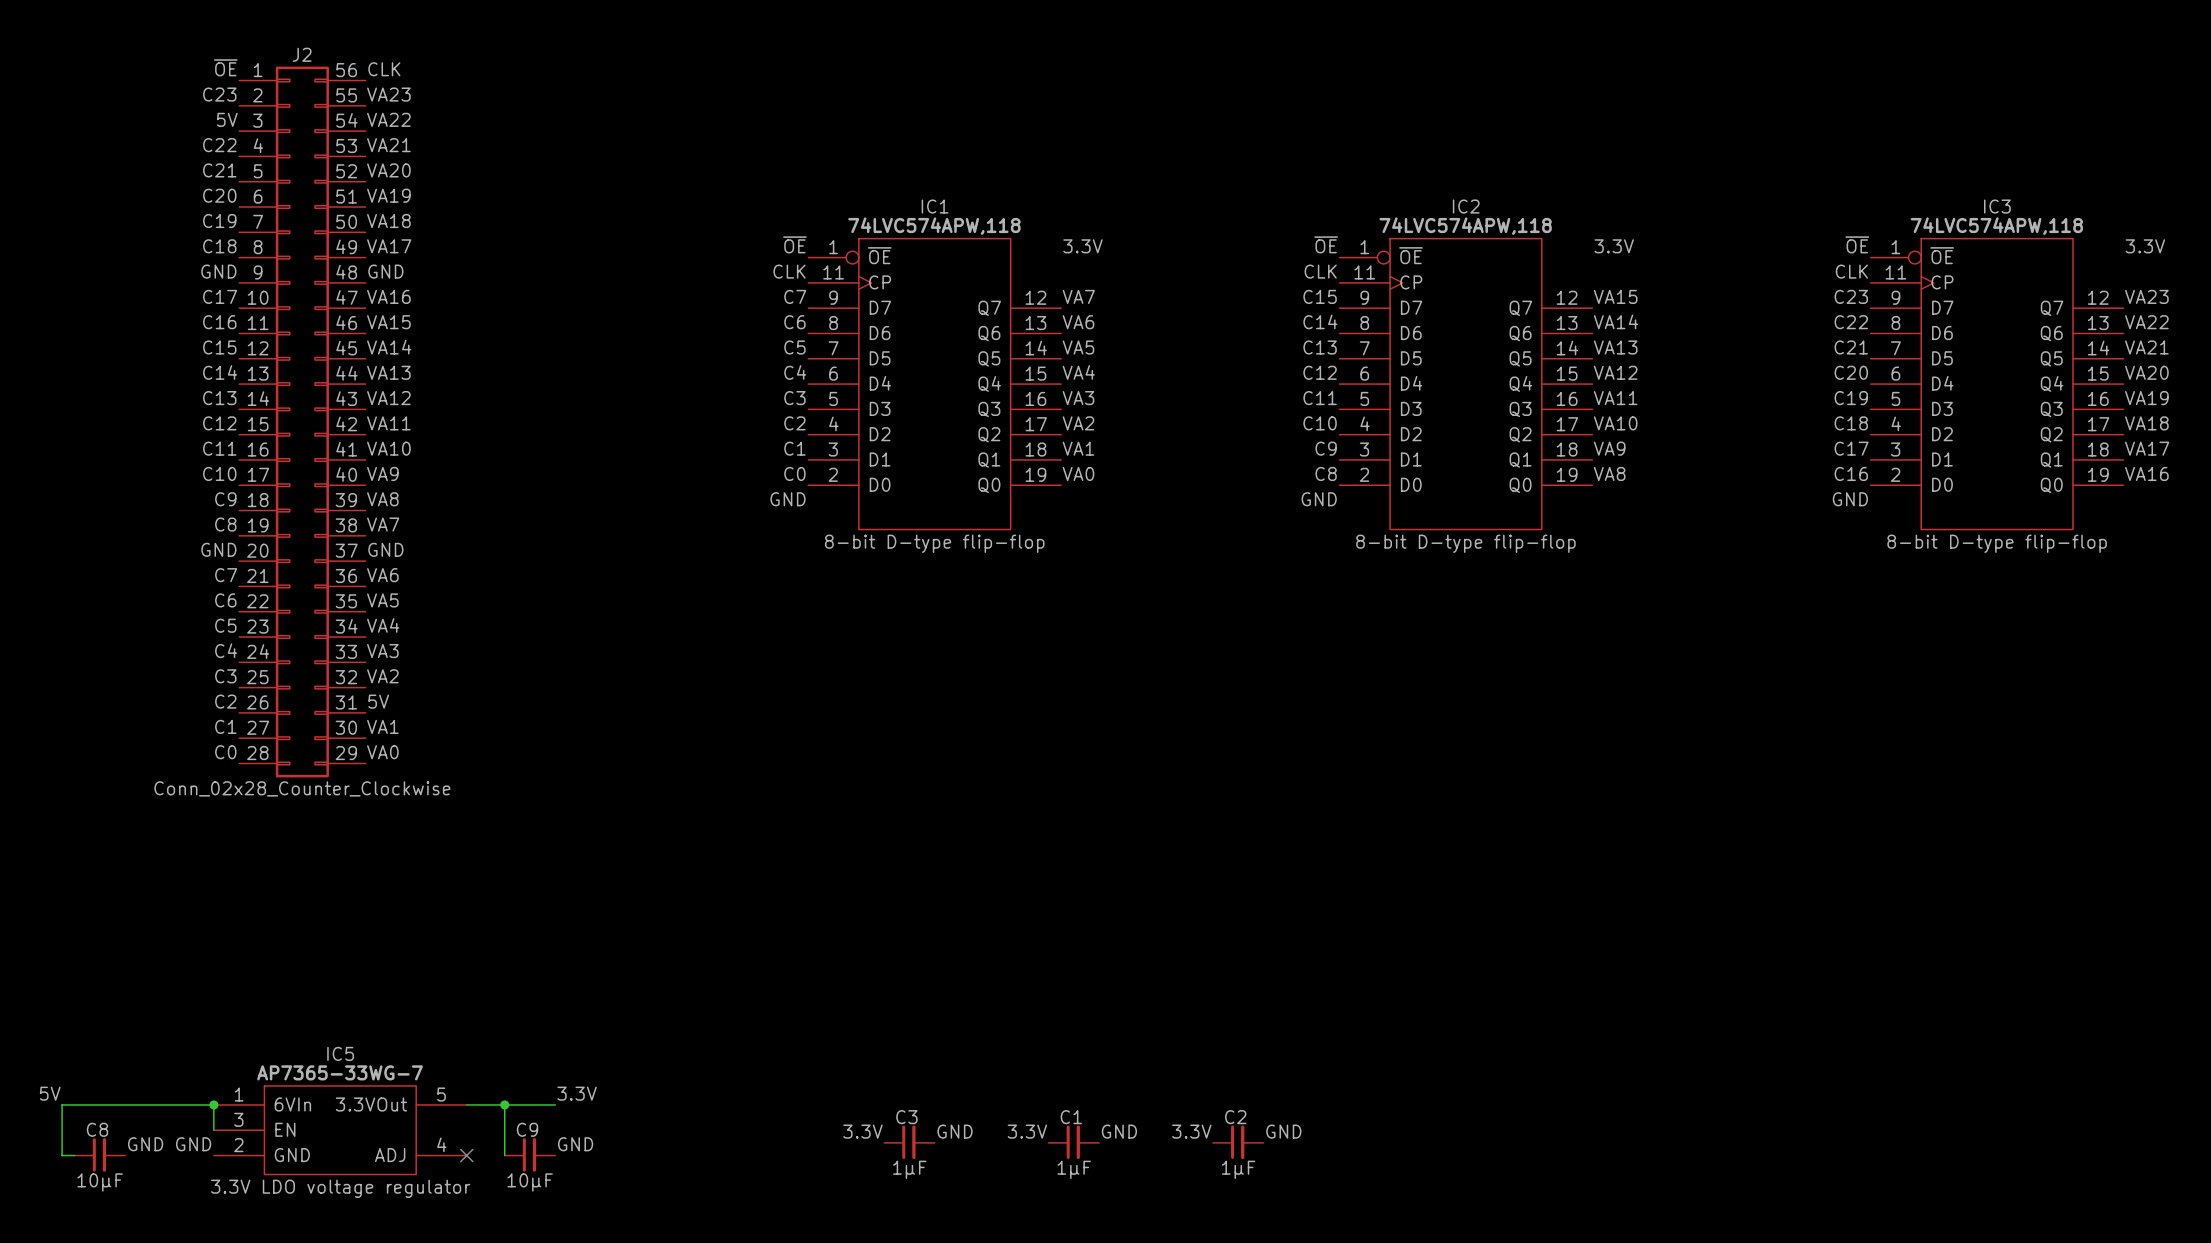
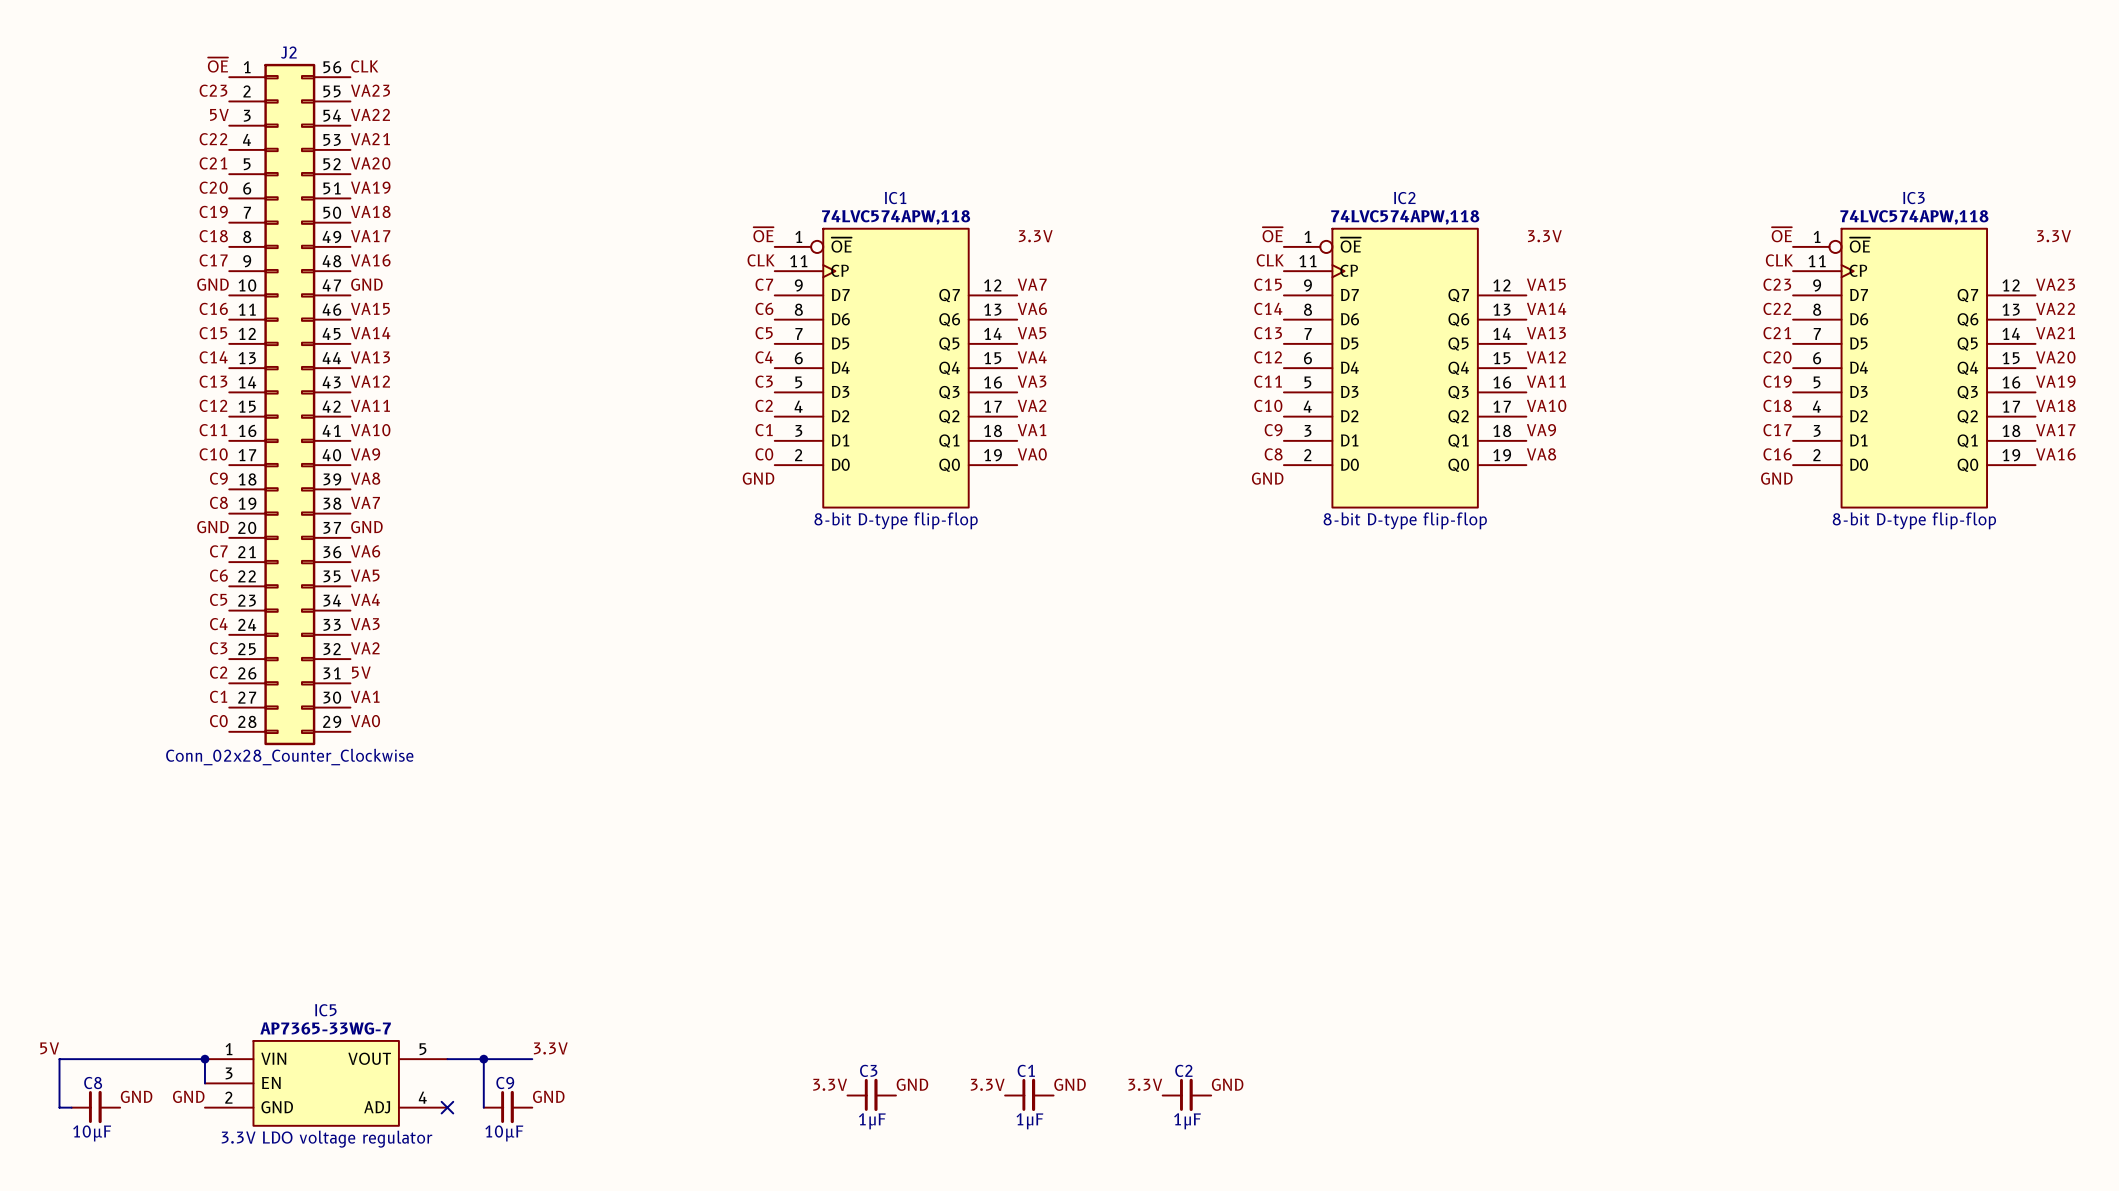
label: GND (218, 271) -> C17 (213, 260)
label: GND (385, 271) -> VA16 (370, 260)
label: C17 (220, 296) -> GND (212, 284)
label: VA16 (388, 296) -> GND (366, 284)
IC5 pin name: 6VIn (292, 1104) -> VIN (273, 1058)
IC5 pin name: 3.3VOut (371, 1104) -> VOUT (369, 1058)

